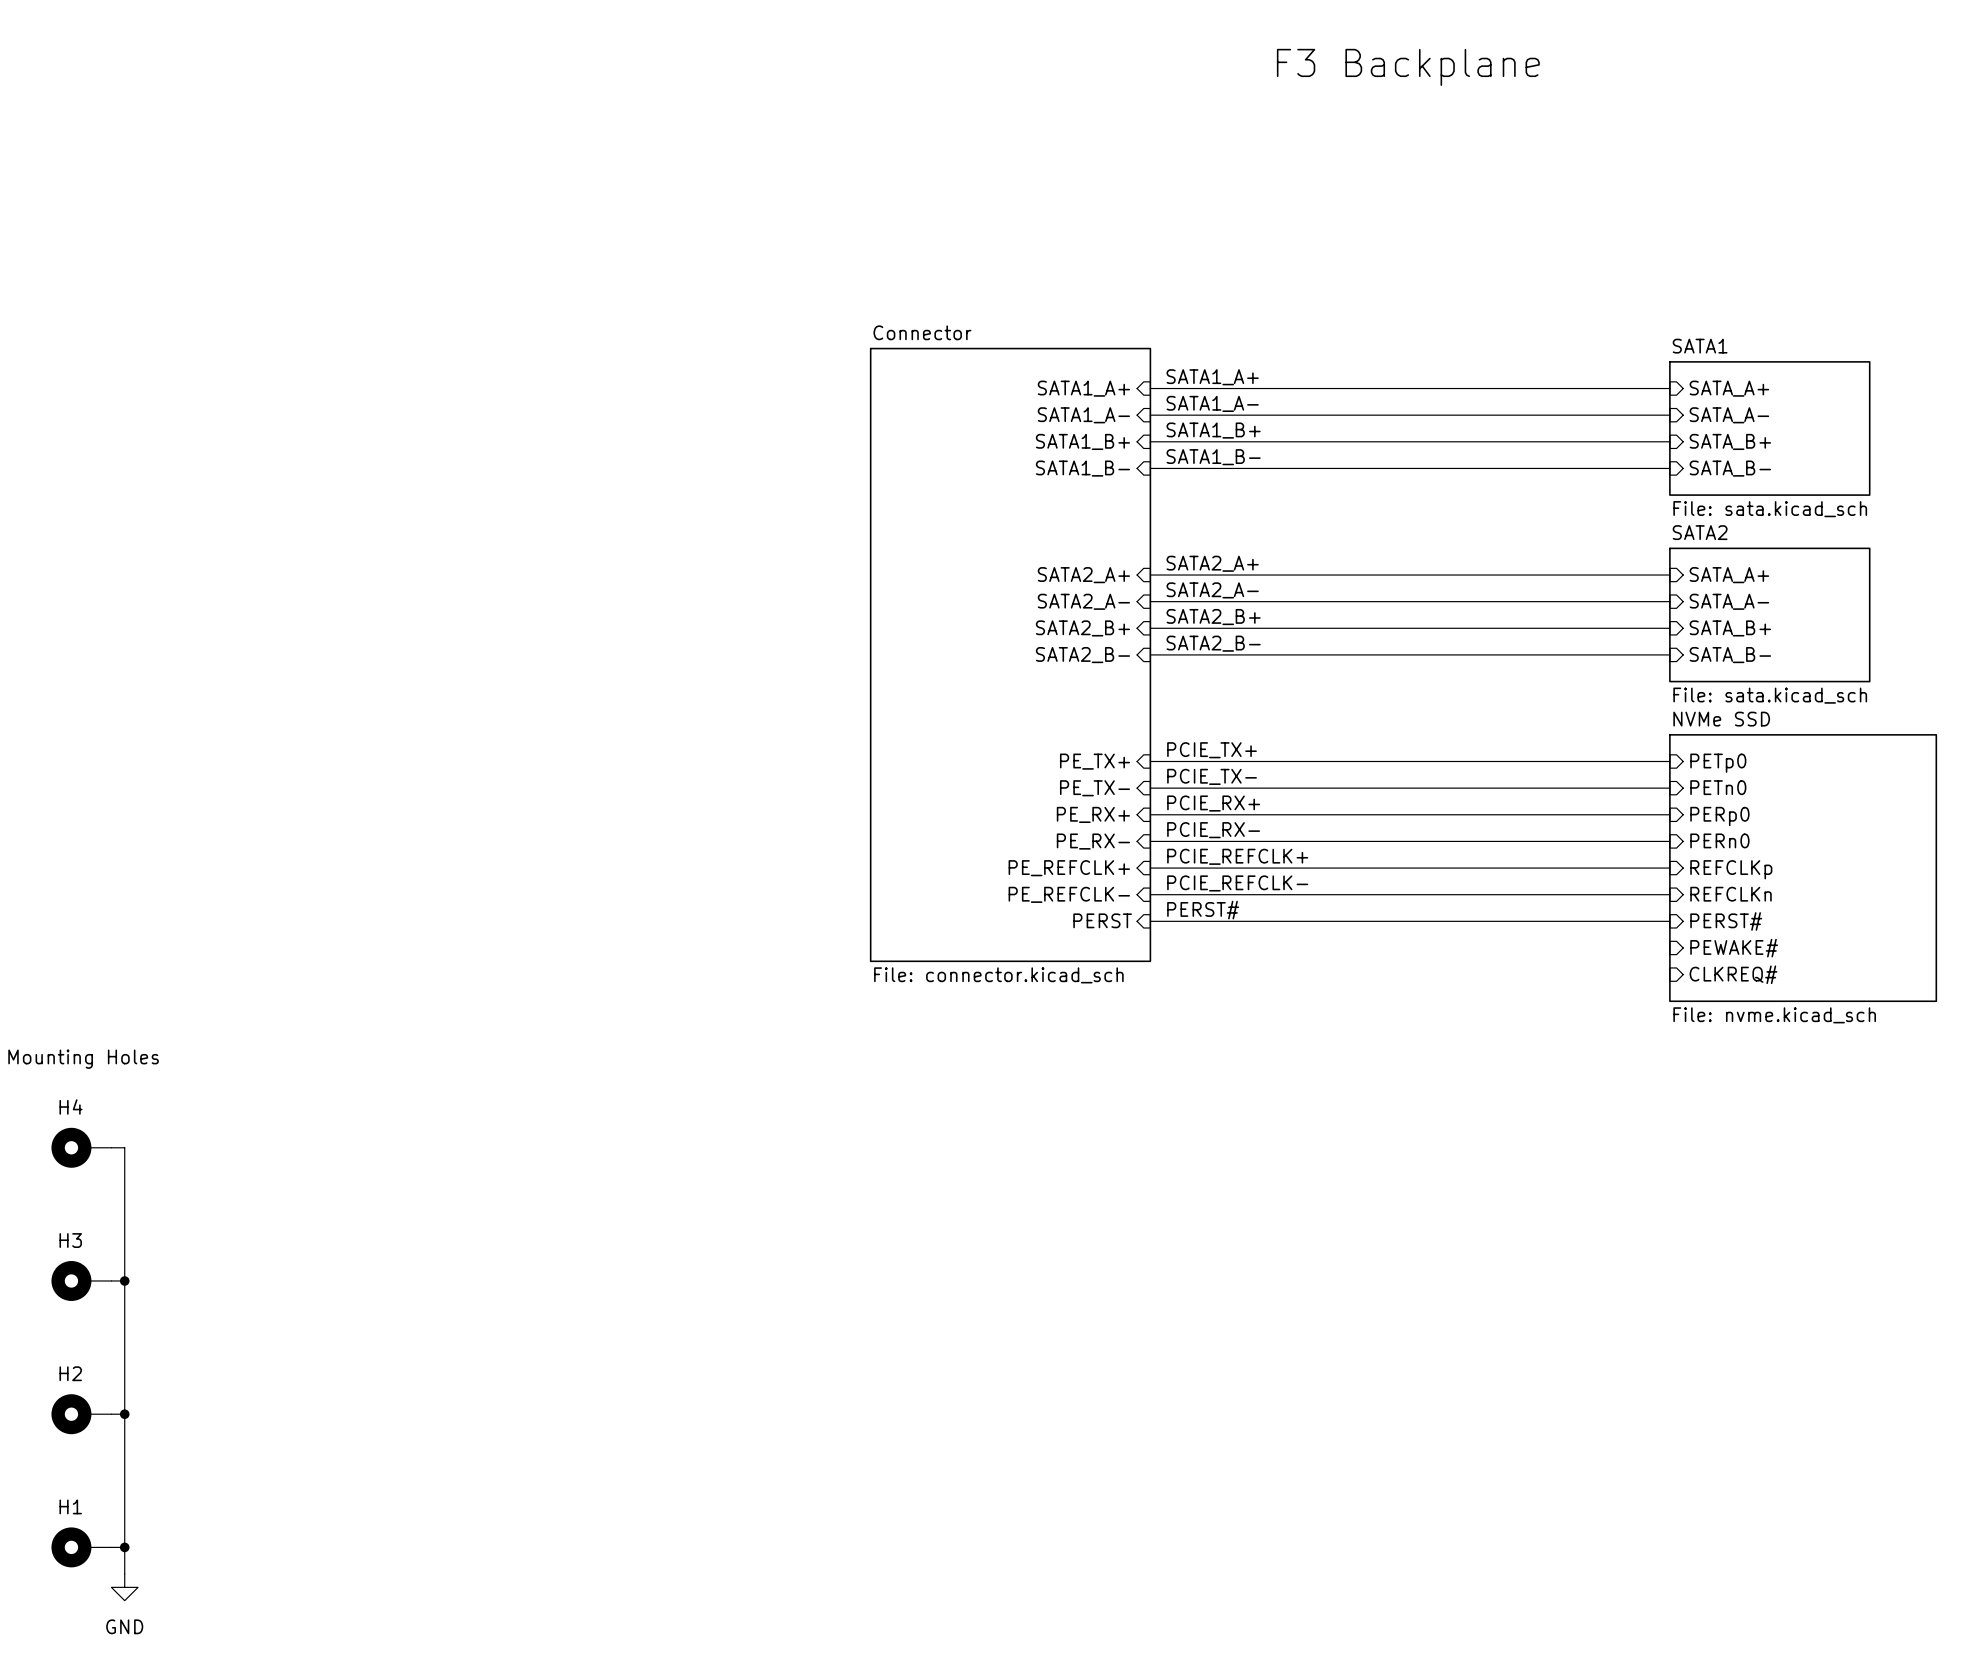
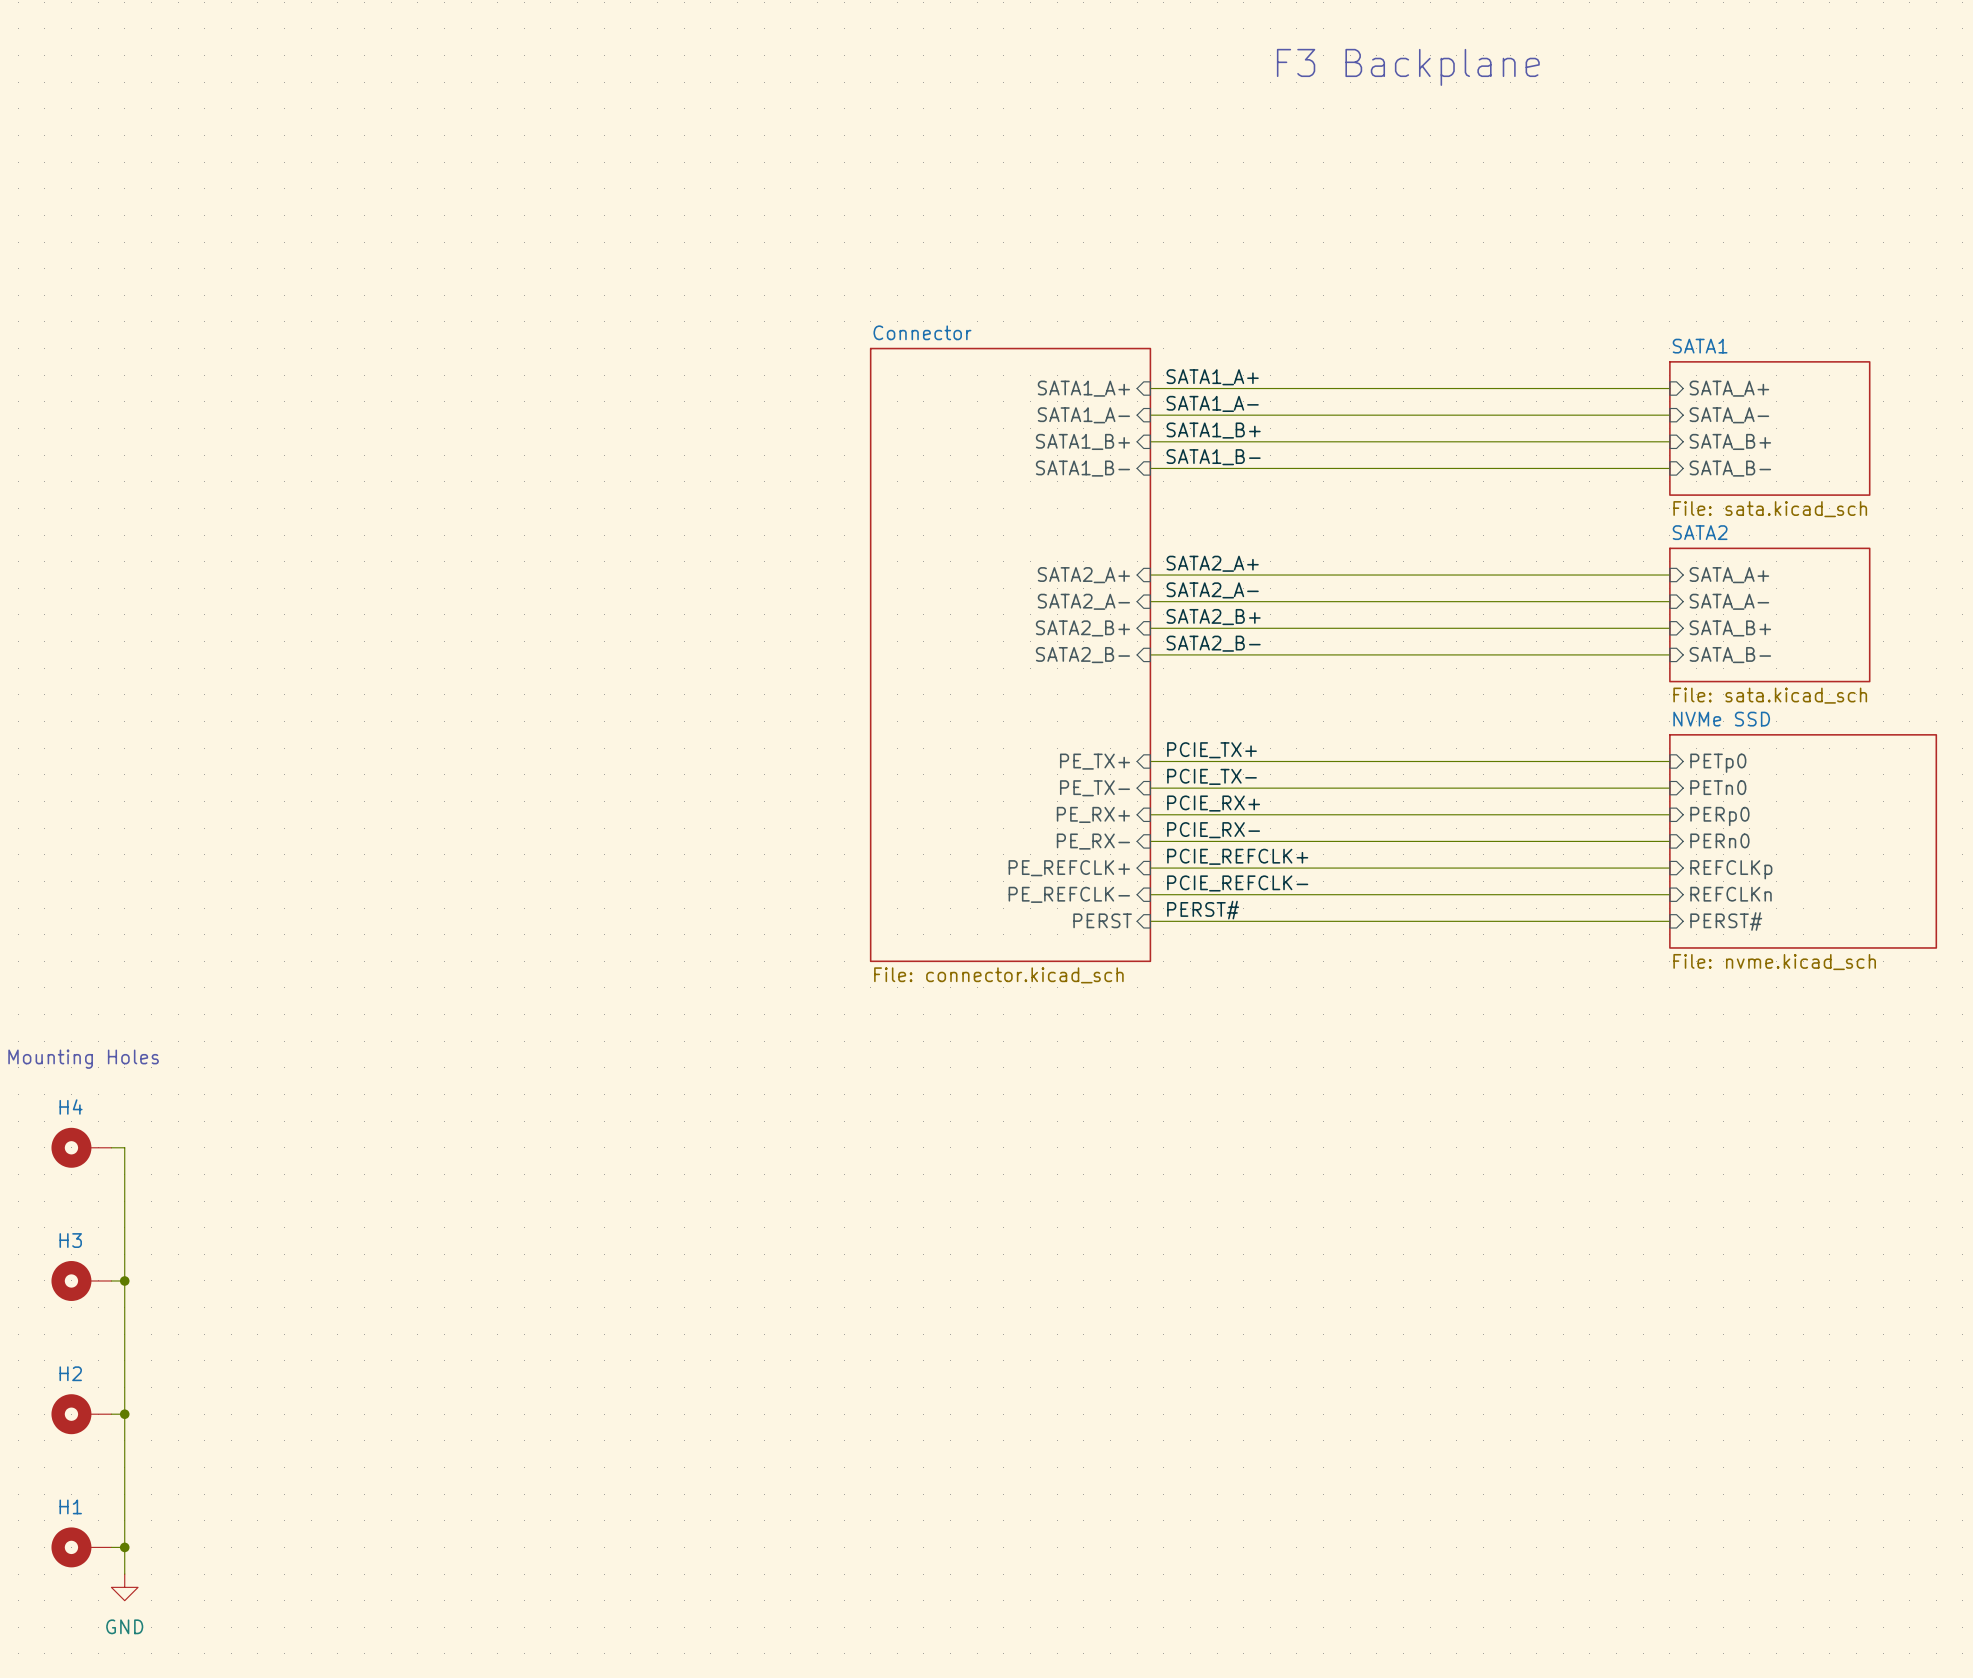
sheet NVMe SSD: none -> File: nvme.kicad_sch (1803, 841)
sheet NVMe SSD: File: nvme.kicad_sch (1803, 868) -> none
sheet pin: PEWAKE# (1734, 948) -> none
sheet pin: CLKREQ# (1733, 974) -> none

